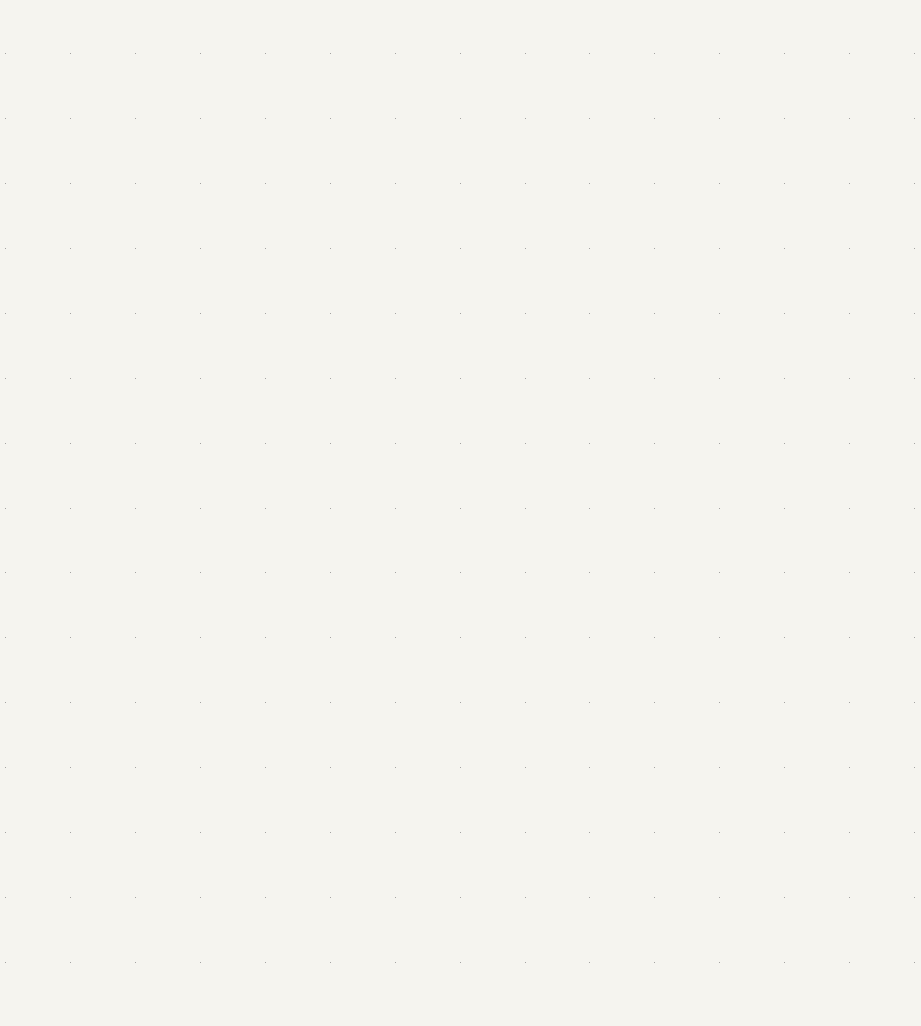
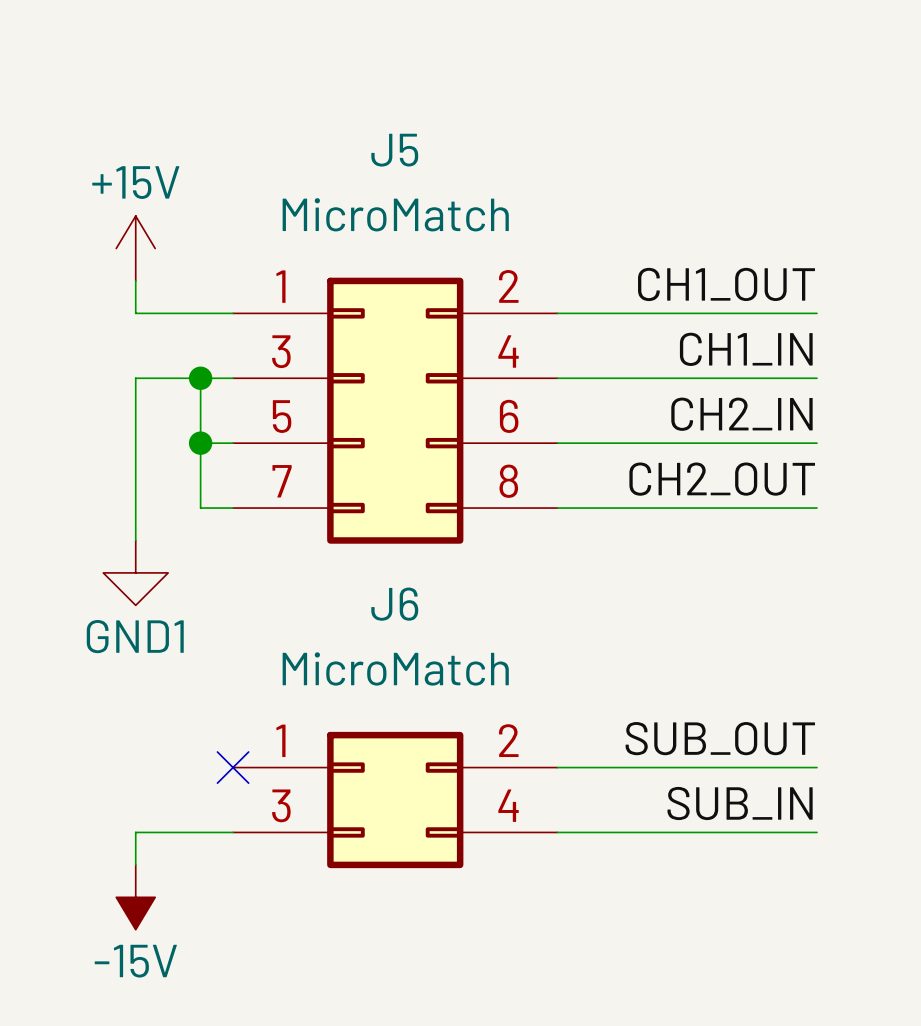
power symbol: none -> +15V (135, 248)
wire: none -> (135, 280) (135, 313) (233, 313)
label: none -> CH1_OUT (726, 284)
wire: none -> (557, 313) (817, 313)
label: none -> CH1_IN (746, 349)
wire: none -> (200, 378) (200, 508) (233, 508)
junction: none -> (200, 378)
wire: none -> (233, 378) (135, 378) (135, 540)
wire: none -> (557, 378) (817, 378)
J5: none -> MicroMatch (395, 410)
label: none -> CH2_IN (741, 414)
wire: none -> (200, 443) (233, 443)
junction: none -> (200, 443)
wire: none -> (557, 443) (817, 443)
label: none -> CH2_OUT (722, 479)
wire: none -> (557, 508) (817, 508)
power symbol: none -> GND1 (135, 572)
label: none -> SUB_OUT (720, 738)
no-connect mark: none -> (233, 767)
wire: none -> (557, 767) (817, 767)
J6: none -> MicroMatch (395, 800)
label: none -> SUB_IN (740, 803)
wire: none -> (233, 832) (135, 832) (135, 864)
wire: none -> (557, 832) (817, 832)
power symbol: none -> -15V (135, 897)

